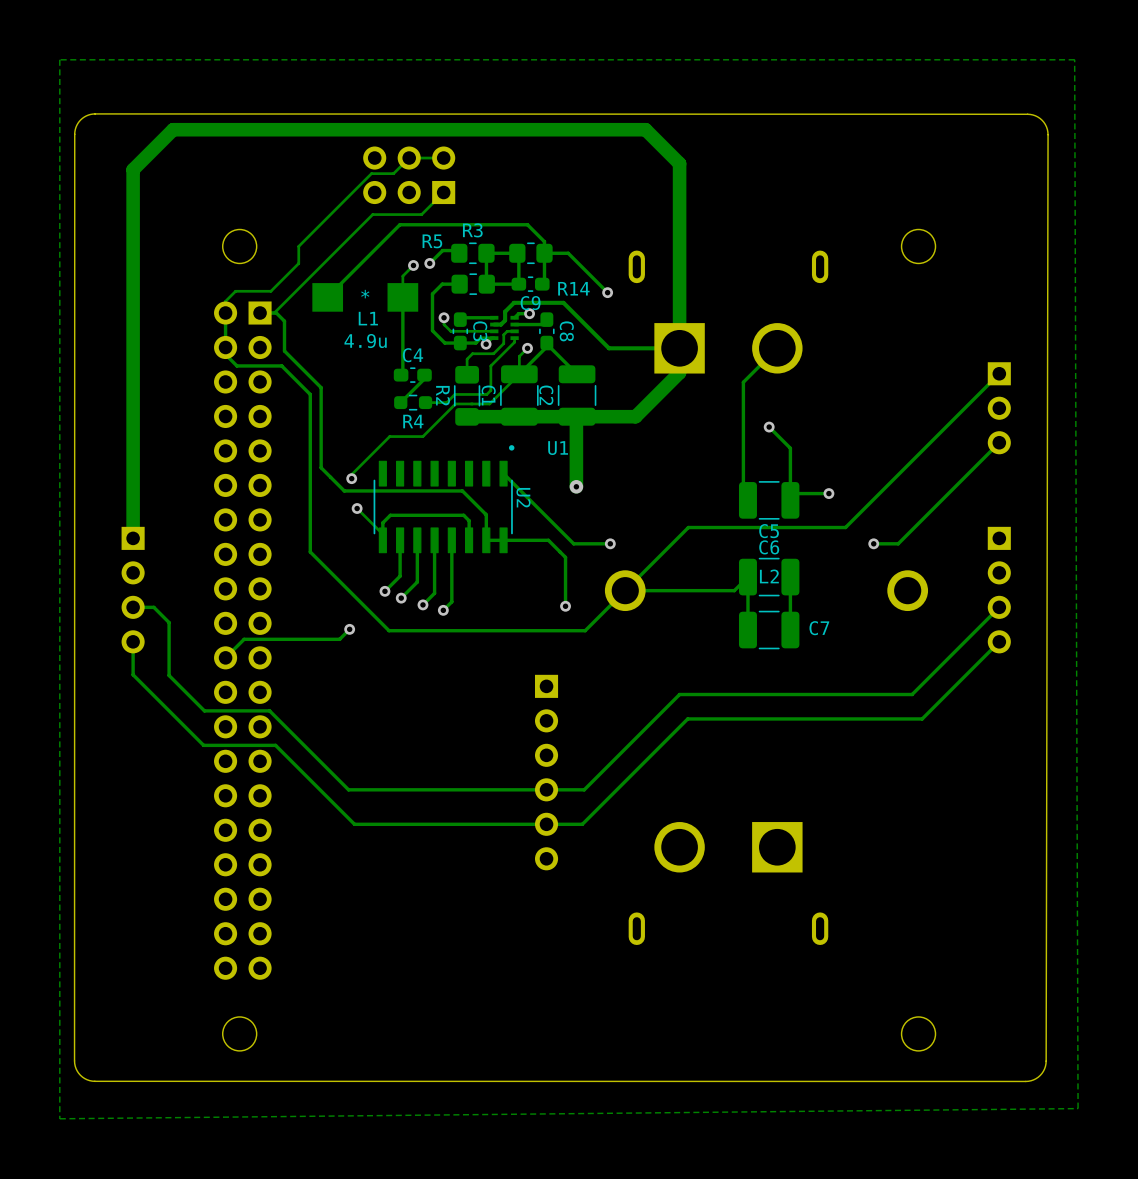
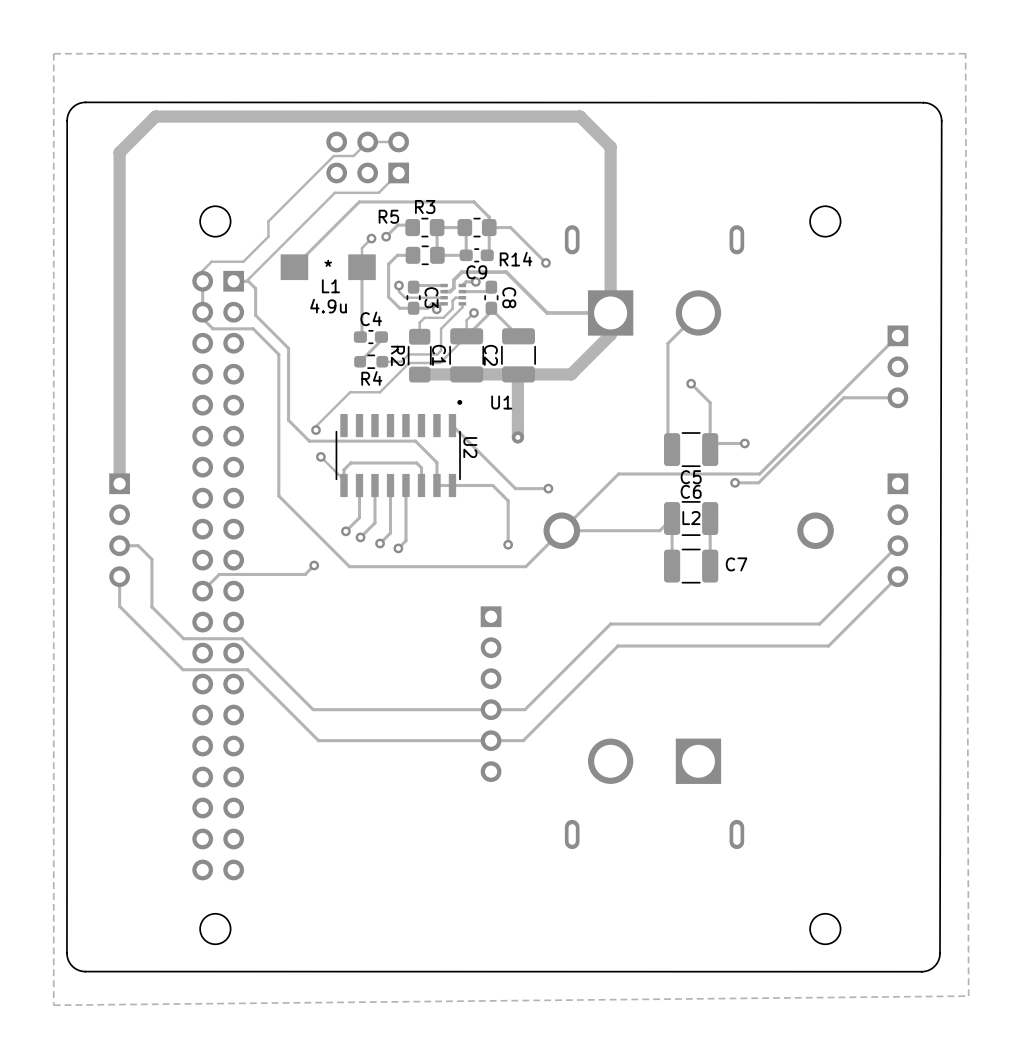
track: (999, 442) (898, 543) (873, 543) -> (897, 397) (843, 397) (758, 482) (735, 482)
via position: (873, 543) -> (735, 482)

